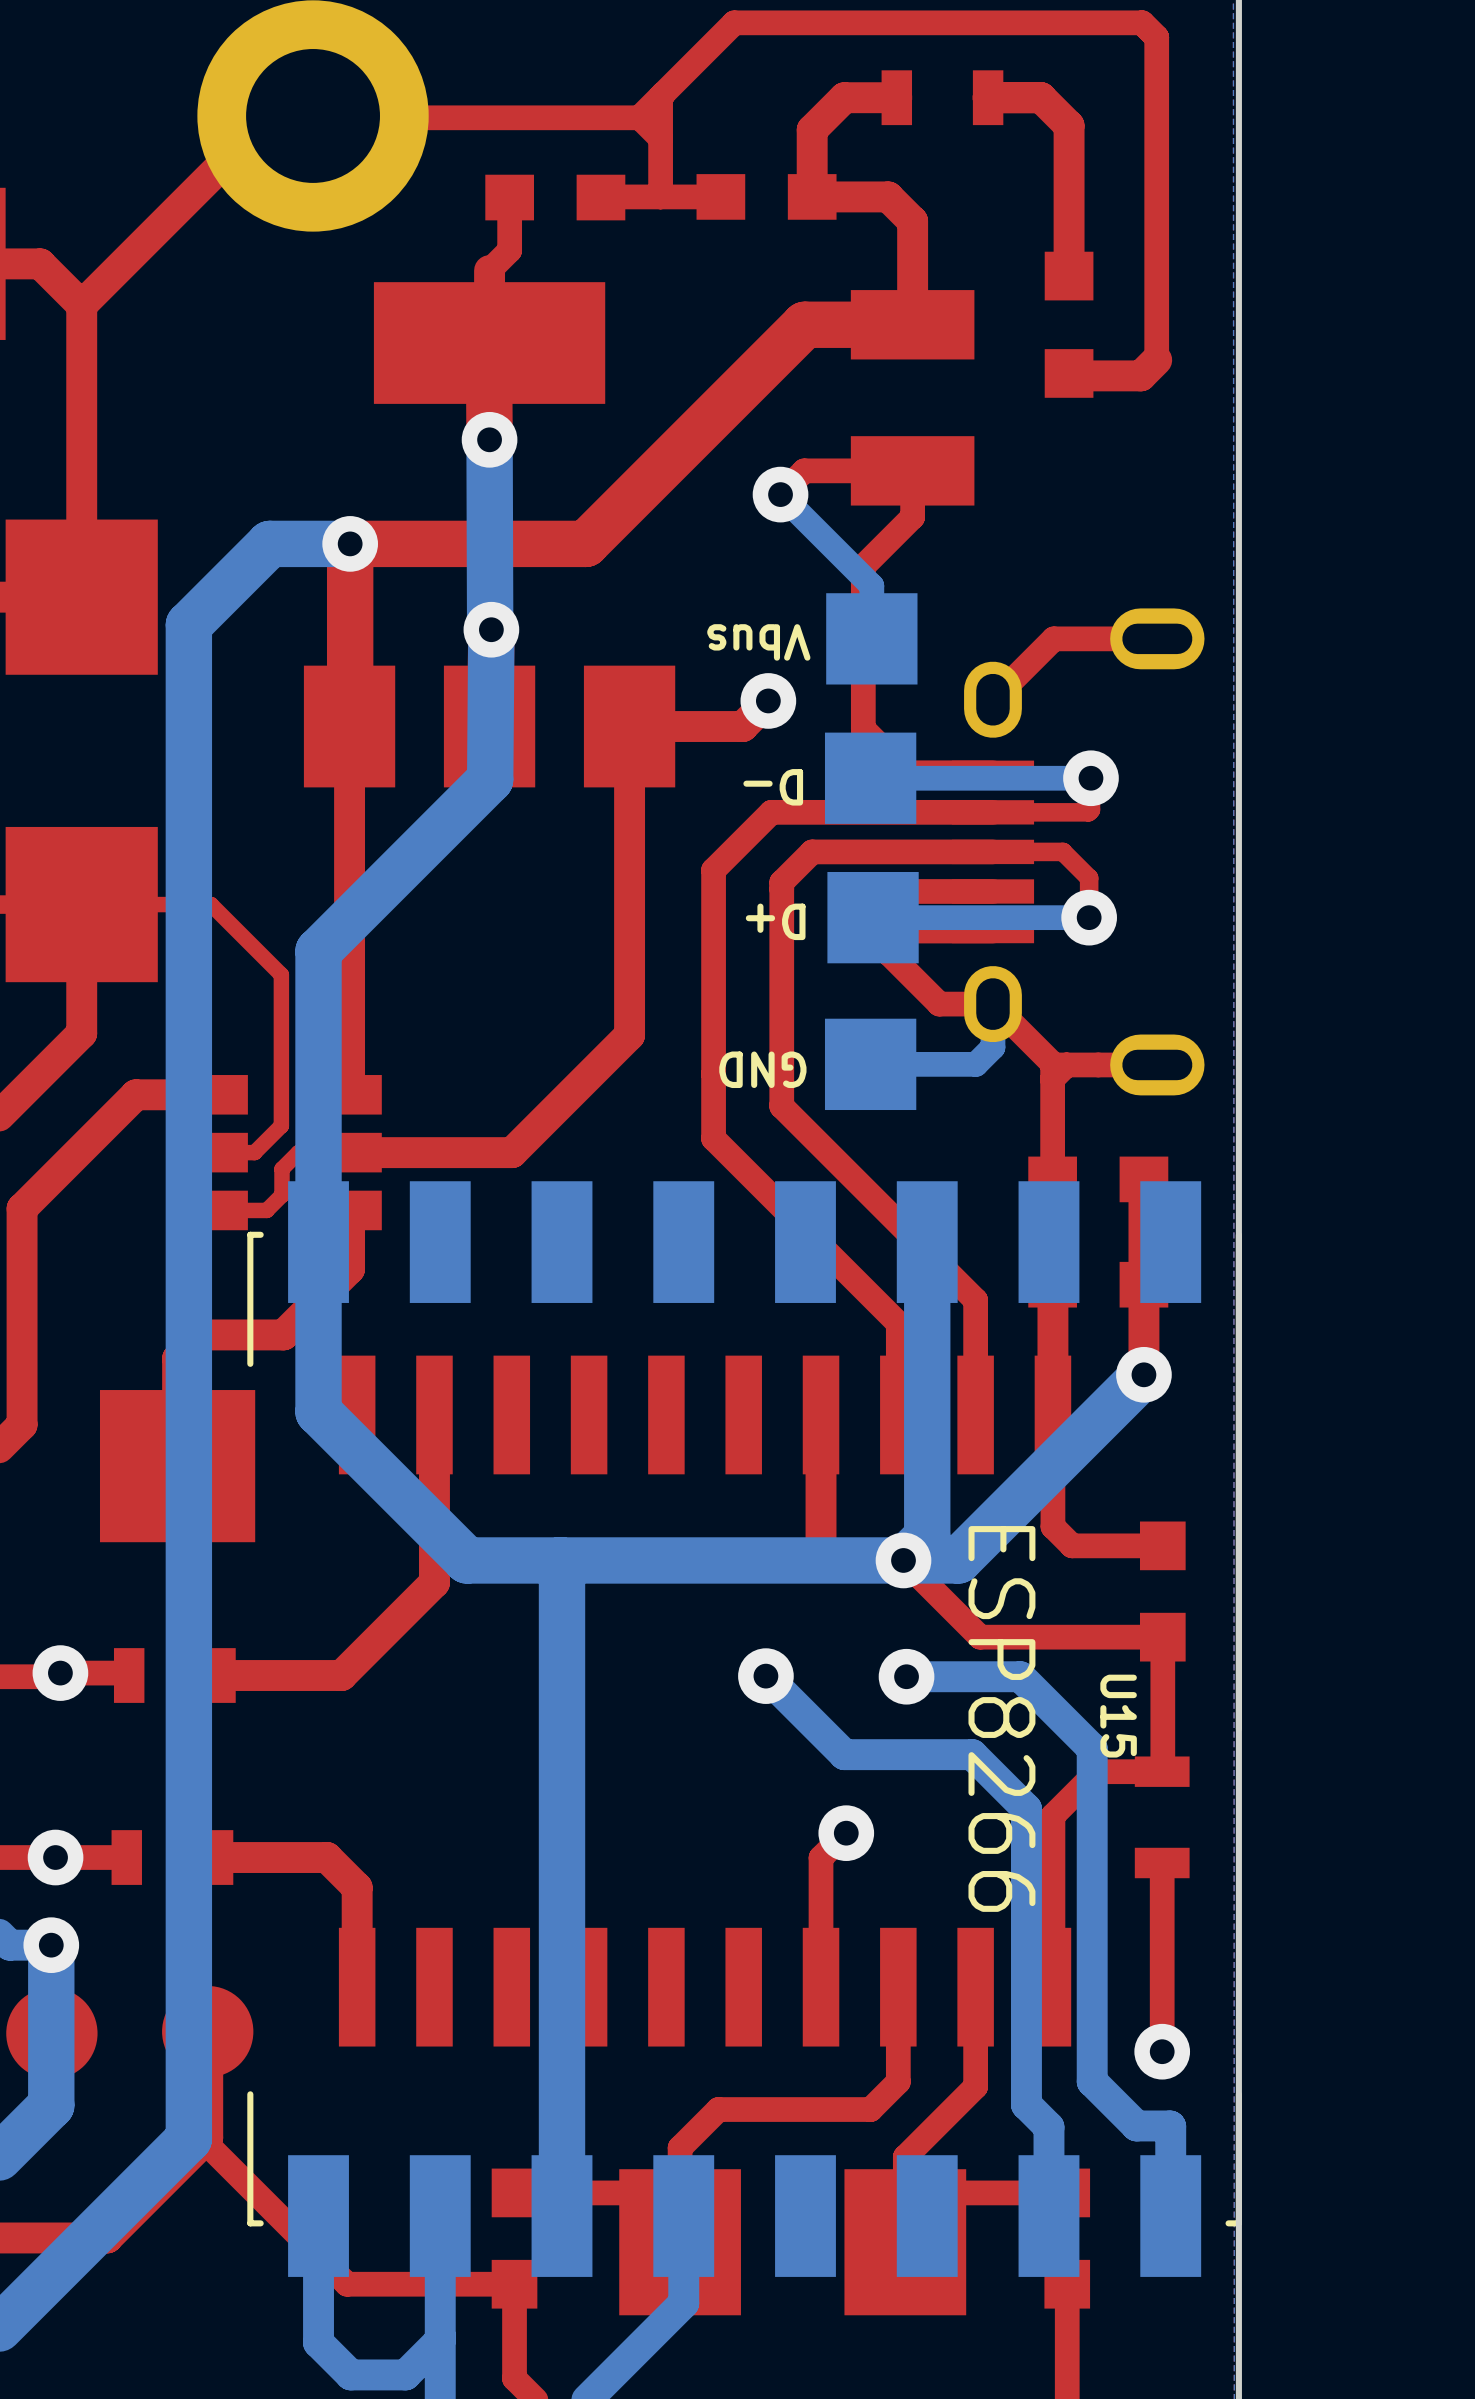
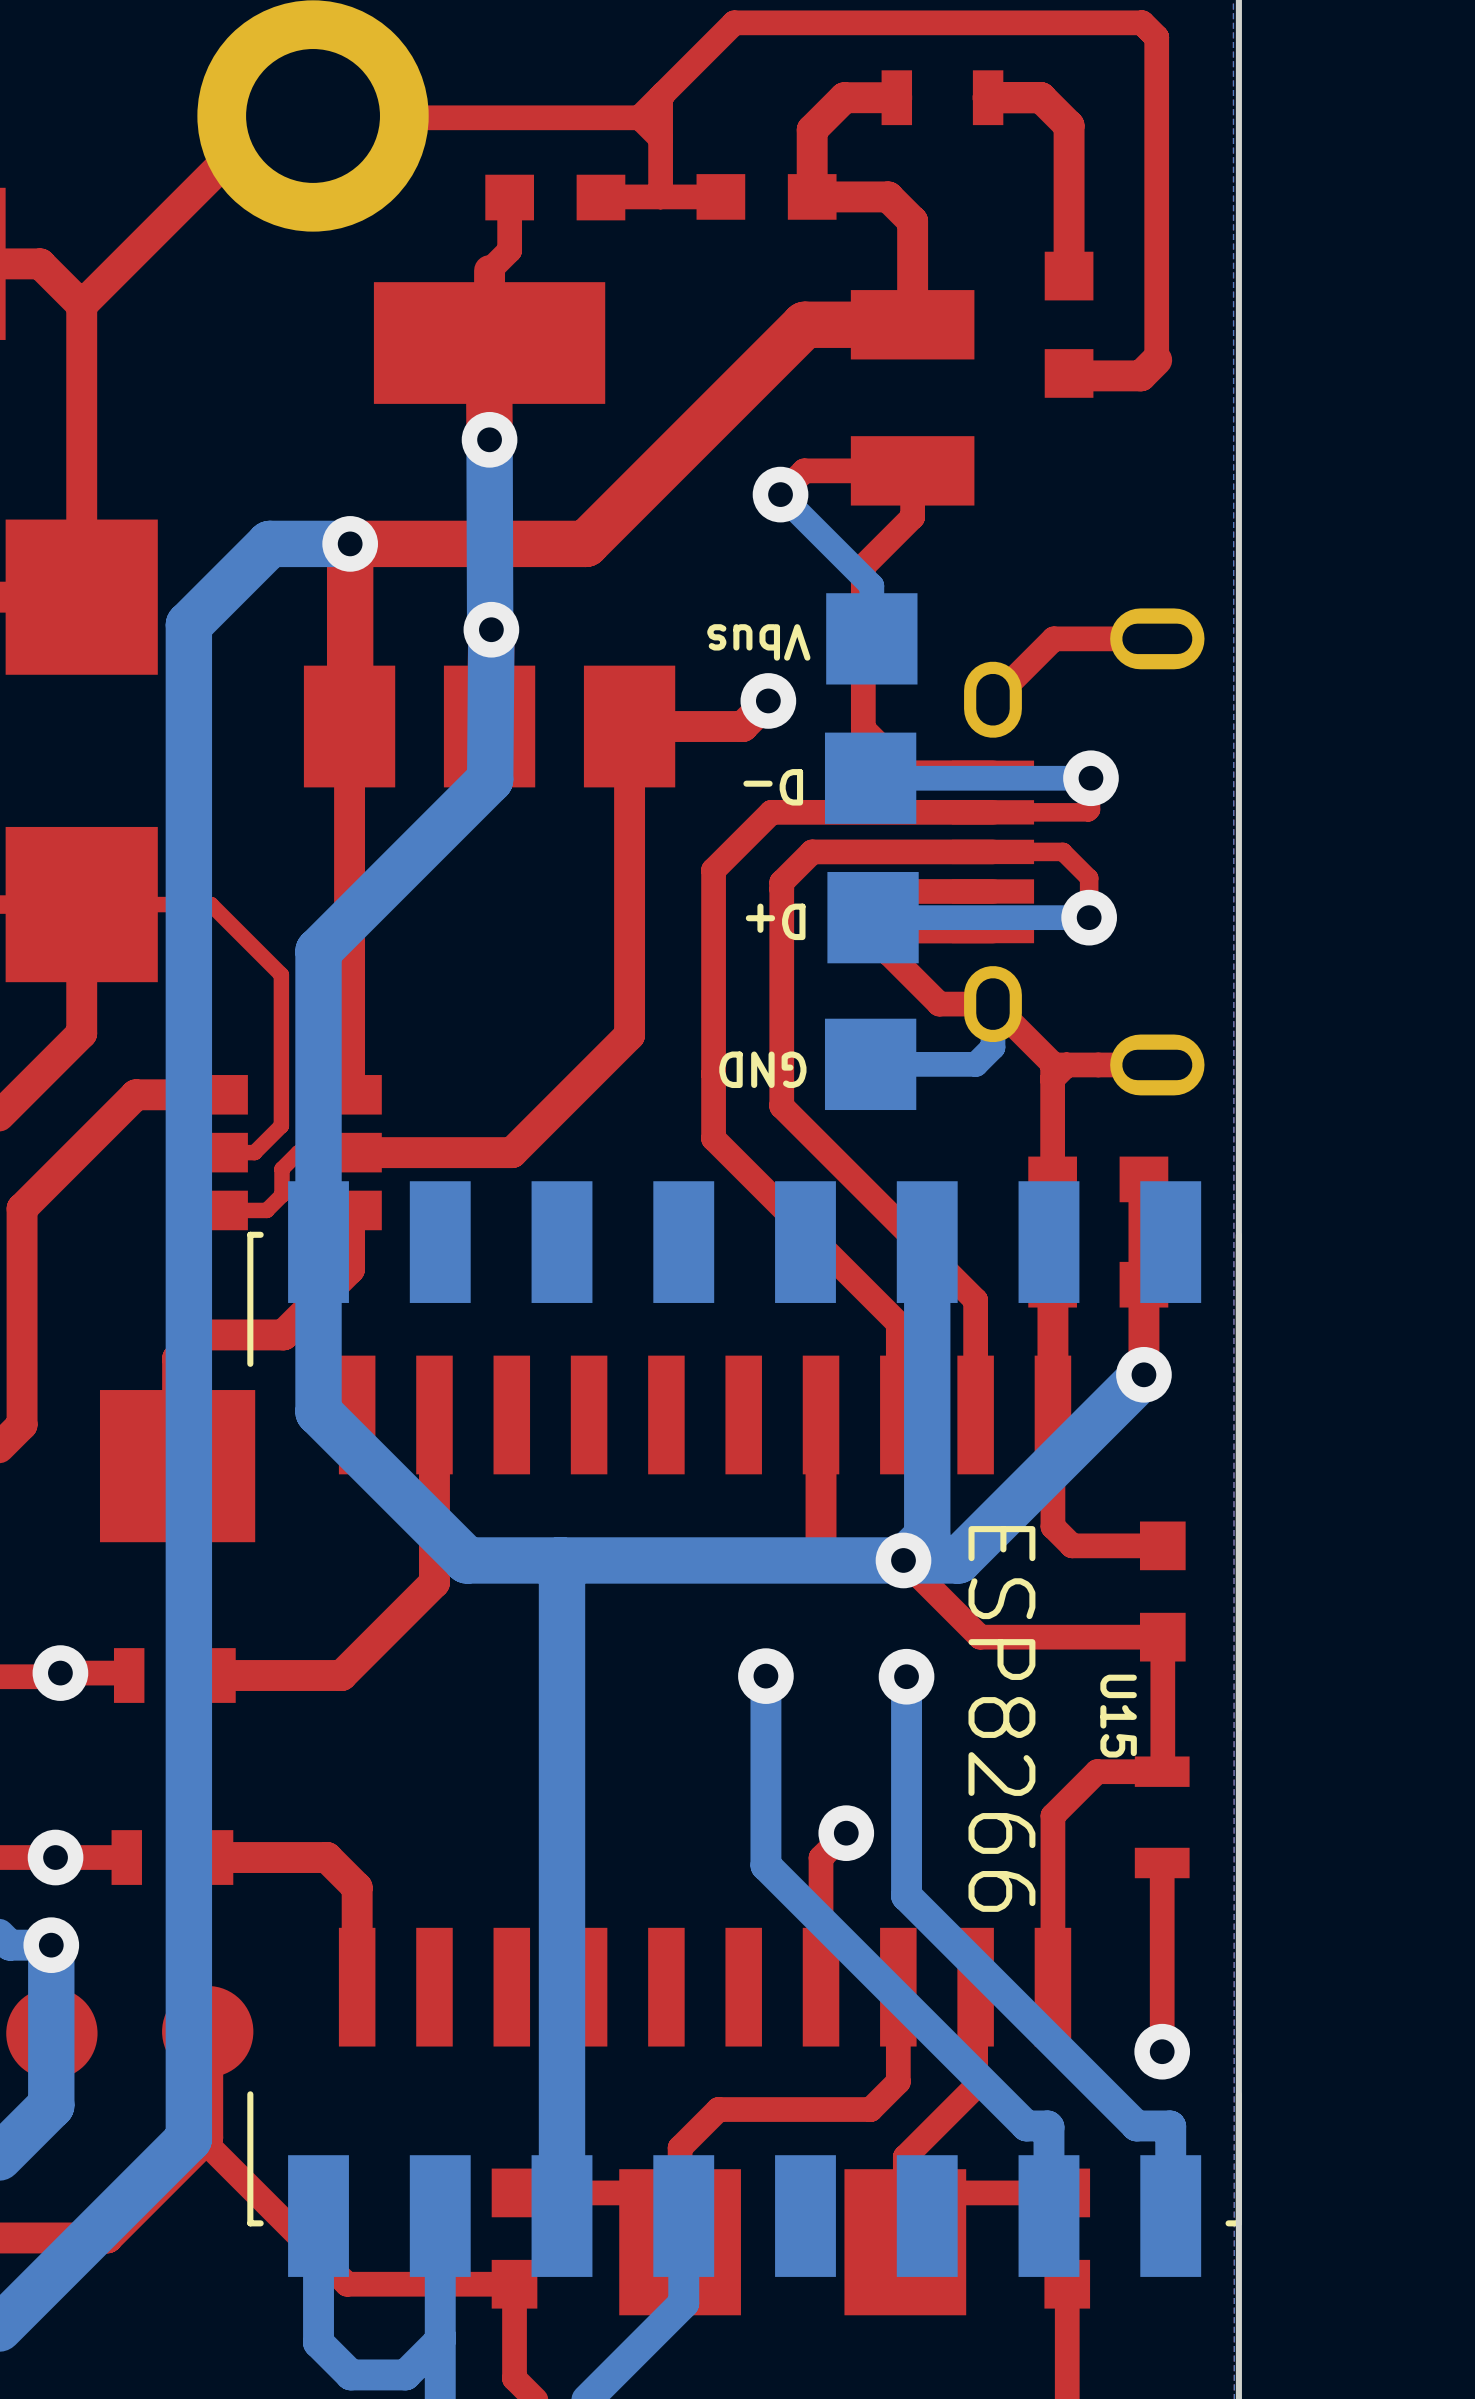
bottom track: (765, 1676) (844, 1754) (972, 1754) (1026, 1808) (1026, 2104) (1047, 2125) -> (765, 1676) (765, 1865) (1026, 2125) (1047, 2125)
bottom track: (906, 1676) (1020, 1676) (1092, 1748) (1092, 2081) -> (906, 1676) (906, 1895) (1092, 2081)

